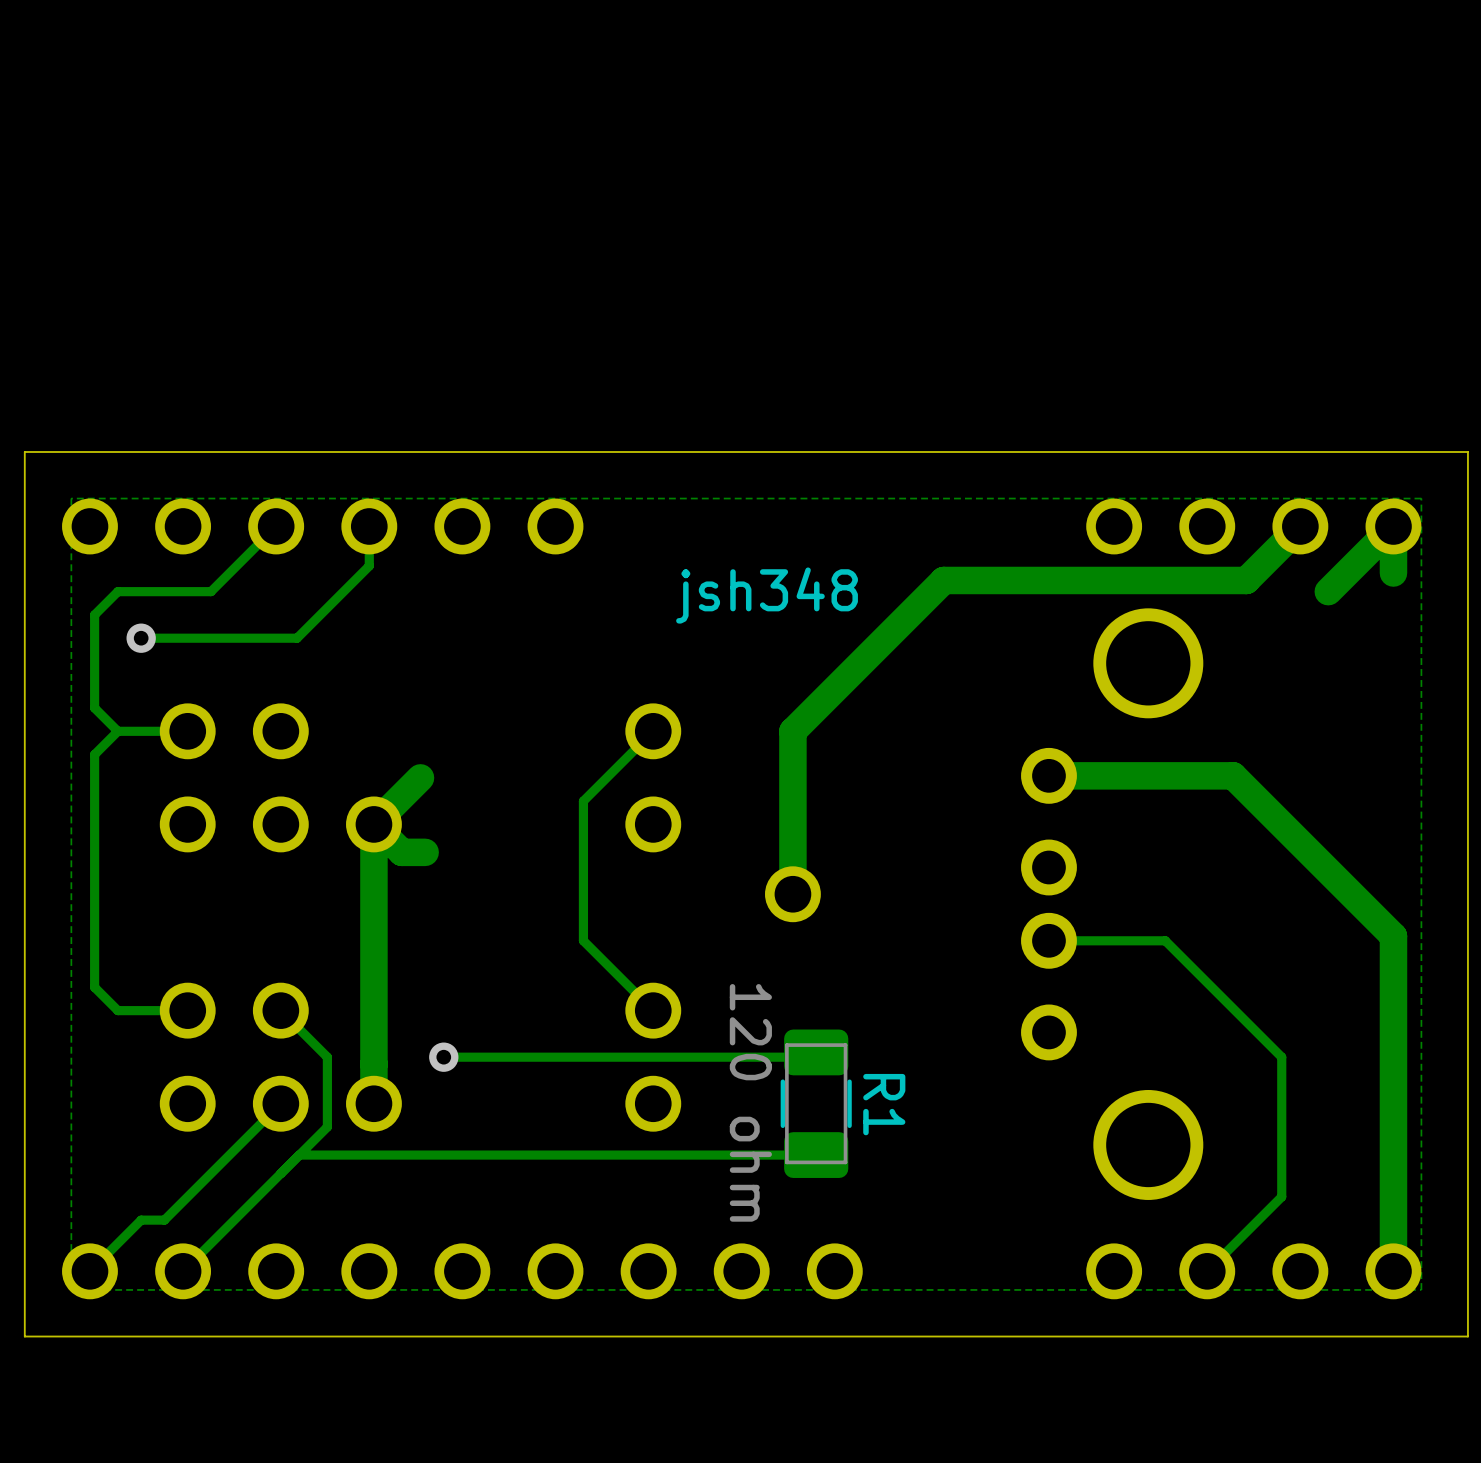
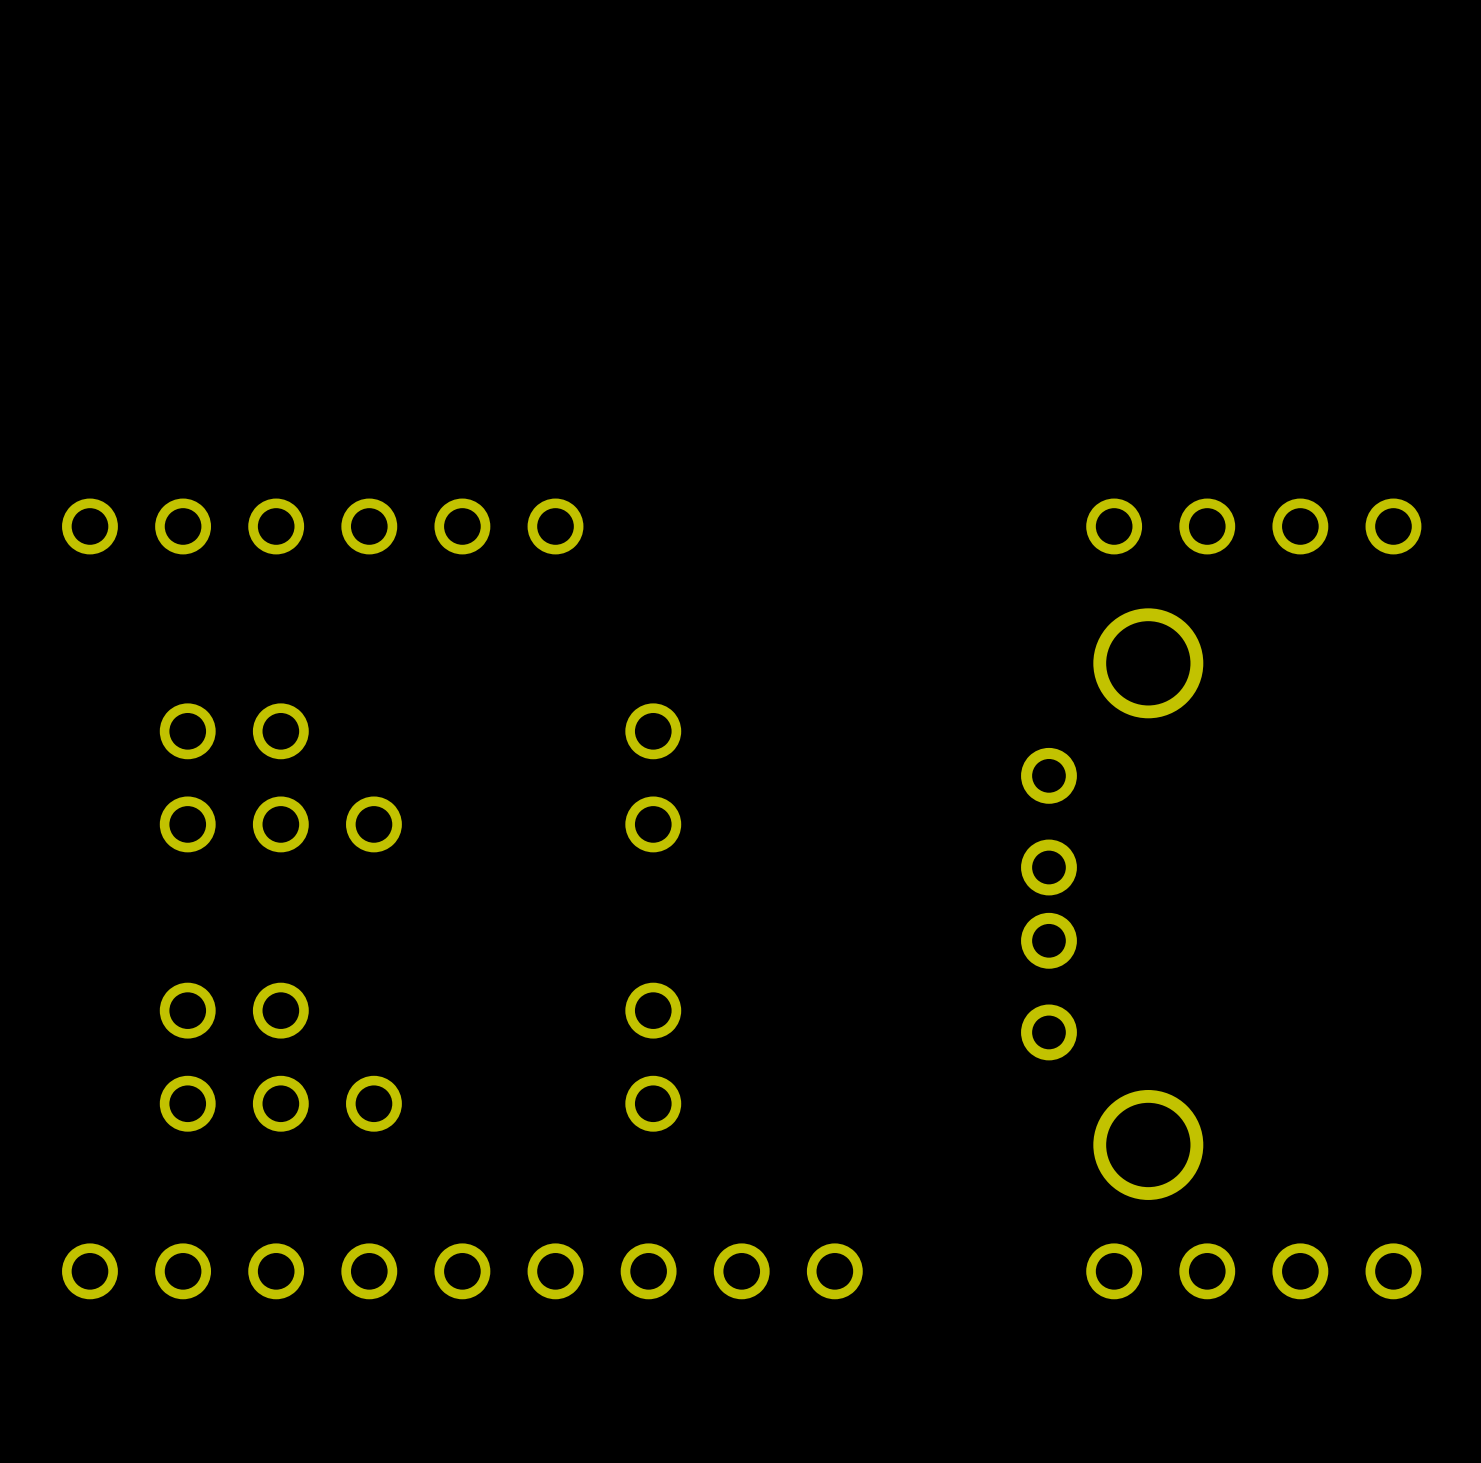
board edge: (1467, 451) (1467, 1336) (24, 1336) (24, 451) (1467, 451) -> none
zone outline: (1421, 498) (71, 498) (71, 1289) (1421, 1289) (1421, 498) -> none
track: (276, 526) (211, 591) (117, 591) (94, 614) (94, 708) (117, 731) -> none
track: (369, 526) (369, 565) (297, 638) (141, 638) -> none
track: (1300, 526) (1246, 580) (943, 580) (792, 731) (792, 894) -> none
track: (1393, 573) (1393, 526) (1328, 591) -> none
text: jsh348 (767, 595) -> none
via: (141, 638) -> none
track: (117, 731) (94, 754) (94, 987) (117, 1010) (187, 1010) -> none
track: (187, 731) (117, 731) -> none
track: (653, 731) (583, 801) (583, 940) (653, 1010) -> none
track: (1048, 775) (1233, 775) (1393, 936) (1393, 1271) -> none
track: (420, 777) (373, 824) -> none
track: (373, 824) (401, 852) (425, 852) -> none
track: (373, 824) (373, 1103) -> none
part: (792, 894) -> none
track: (1048, 940) (1165, 940) (1281, 1057) (1281, 1196) (1207, 1271) -> none
track: (280, 1010) (327, 1057) (327, 1127) (183, 1271) -> none
track: (816, 1052) (811, 1057) (443, 1057) -> none
via: (443, 1057) -> none
track: (280, 1103) (164, 1220) (141, 1220) (89, 1271) -> none
R1: 120 ohm (816, 1103) -> none
track: (816, 1155) (299, 1155) -> none

